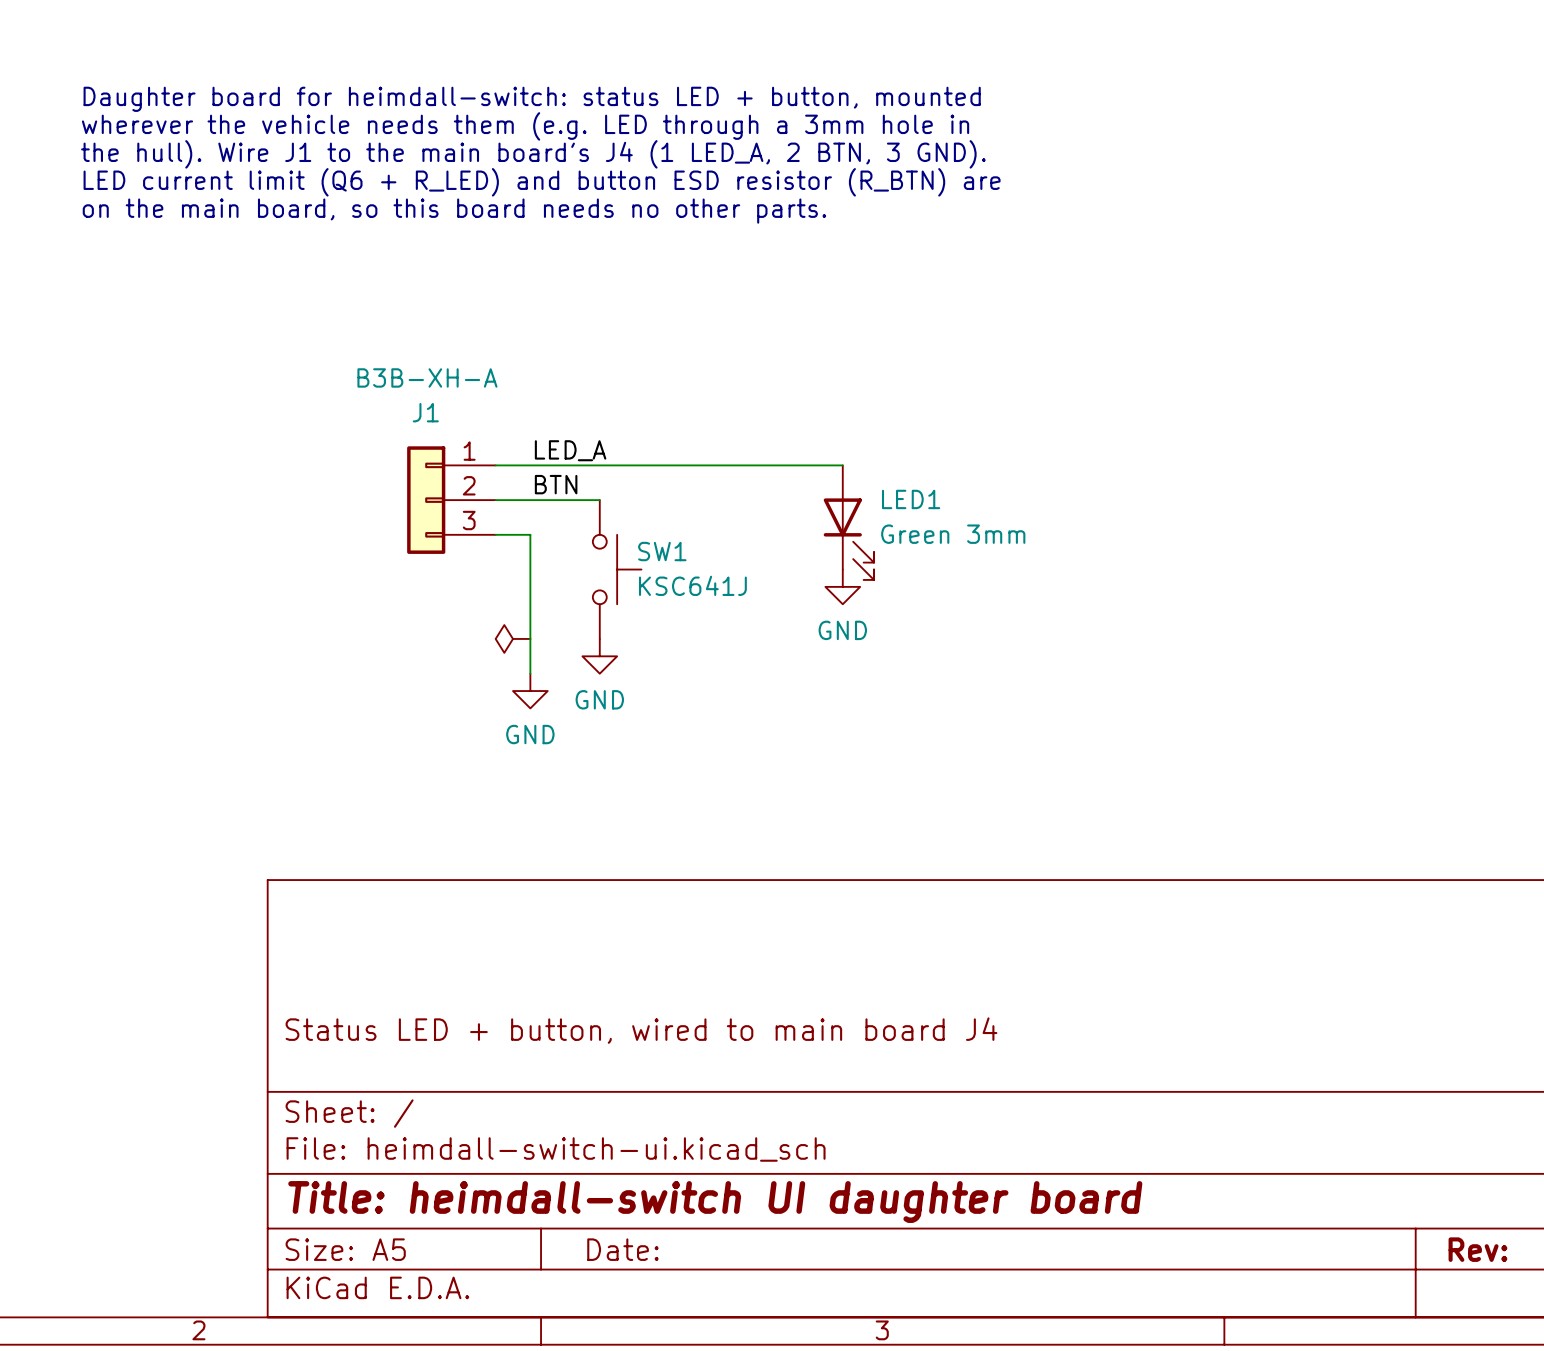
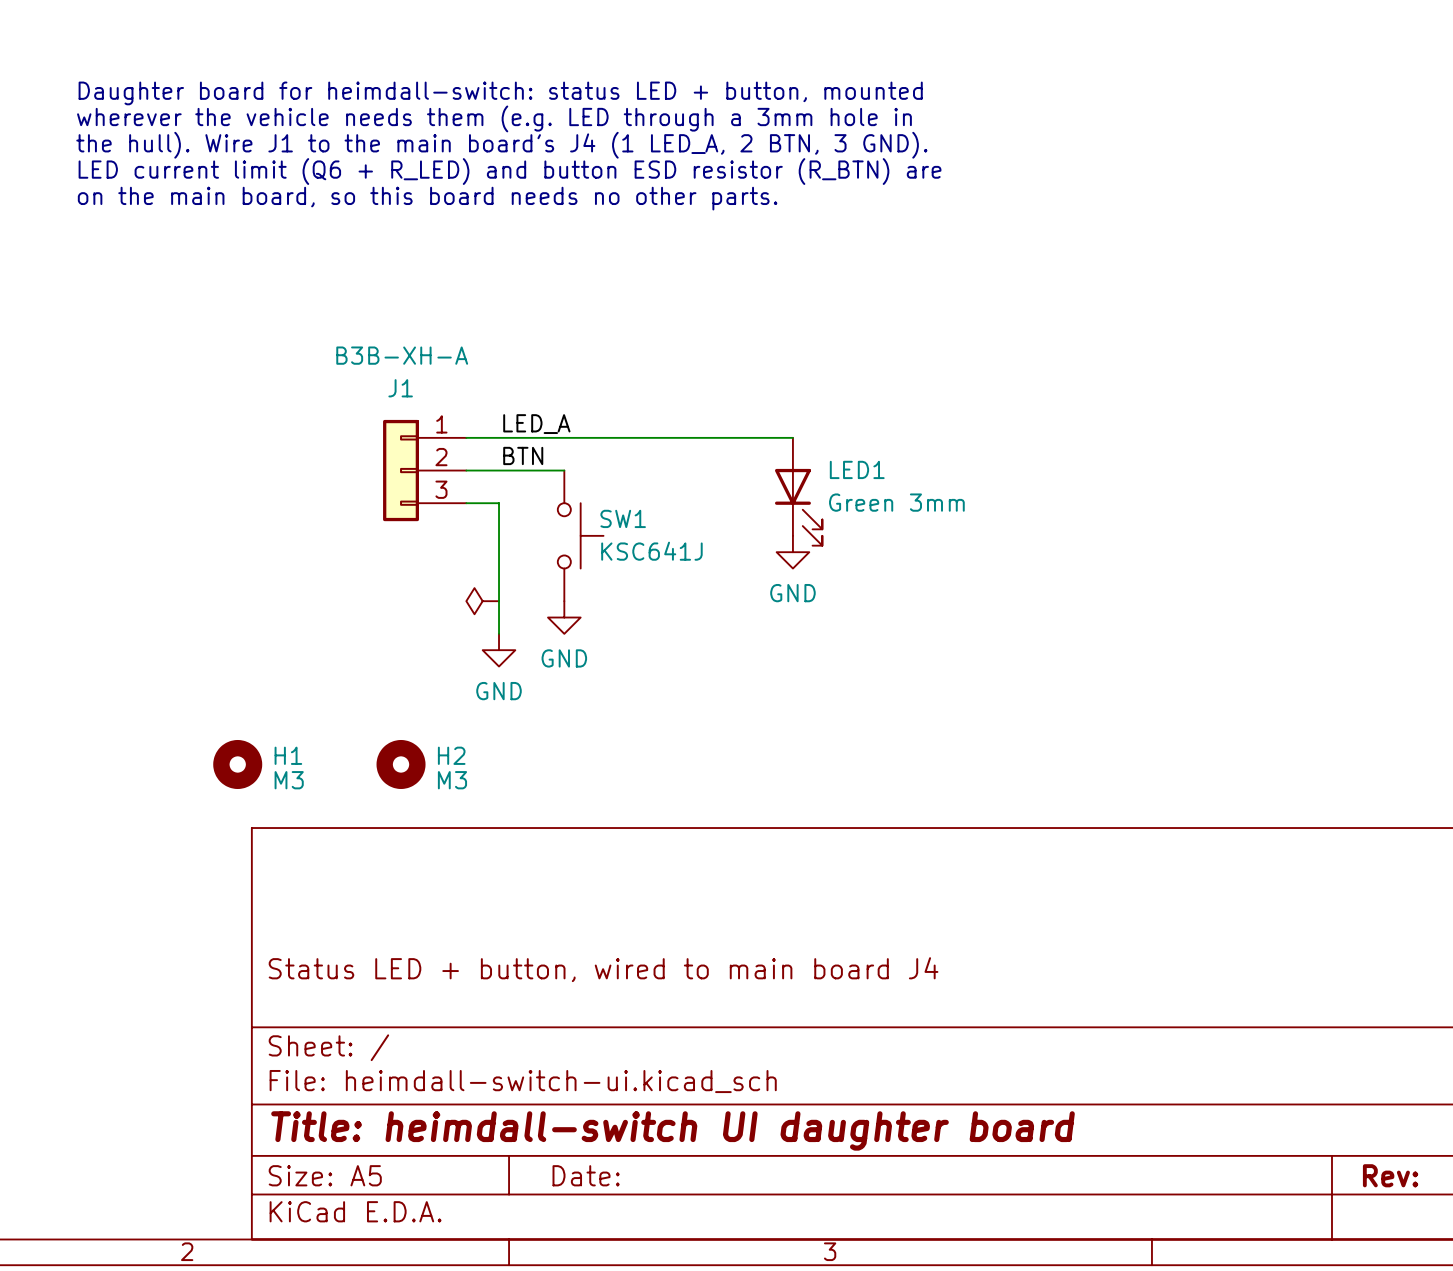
H1: none -> M3 (237, 764)
H2: none -> M3 (401, 764)

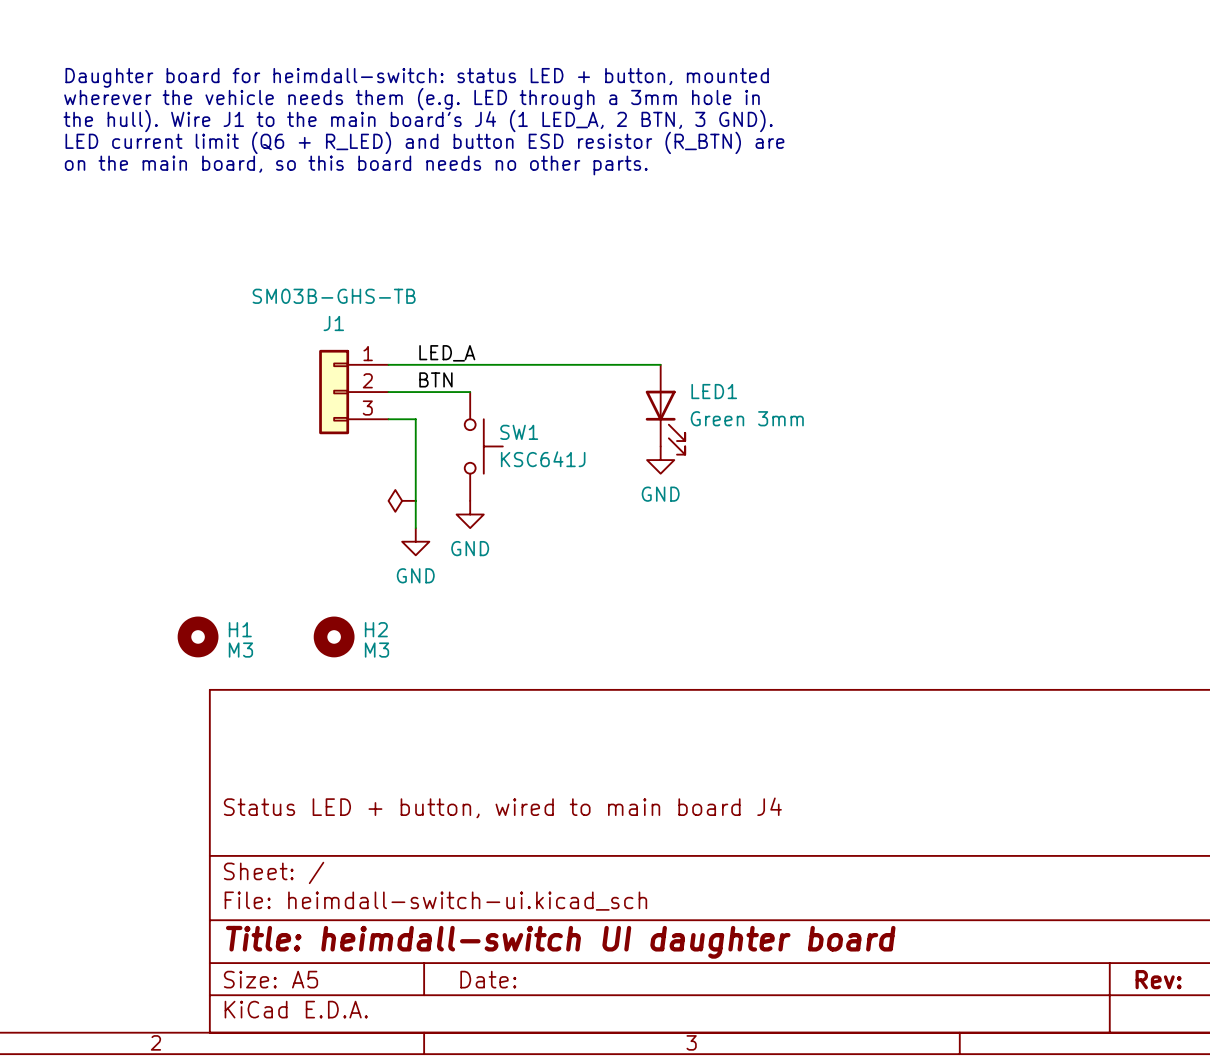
J1 value: B3B-XH-A (402, 355) -> SM03B-GHS-TB (334, 296)

